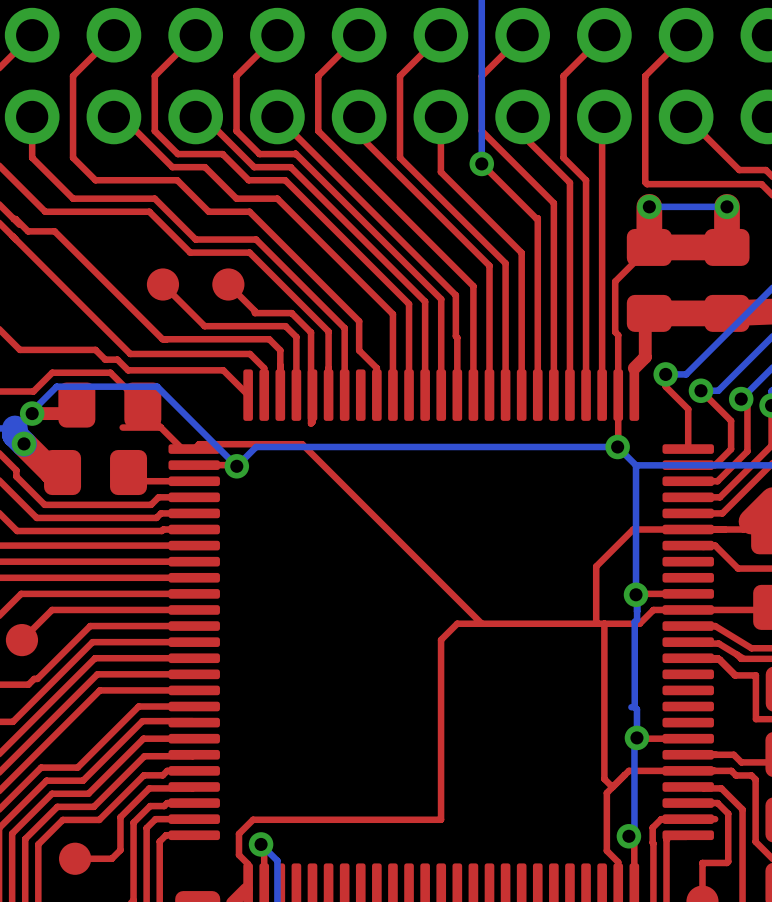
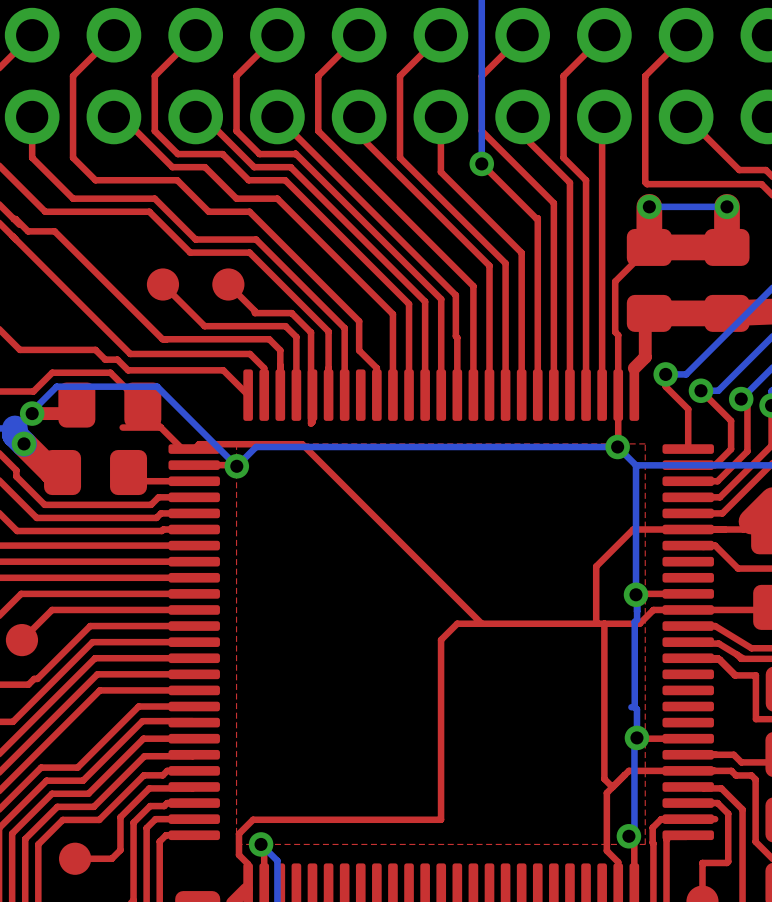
top zone outline: none -> (645, 443) (645, 844) (236, 844) (236, 443) (645, 443)

